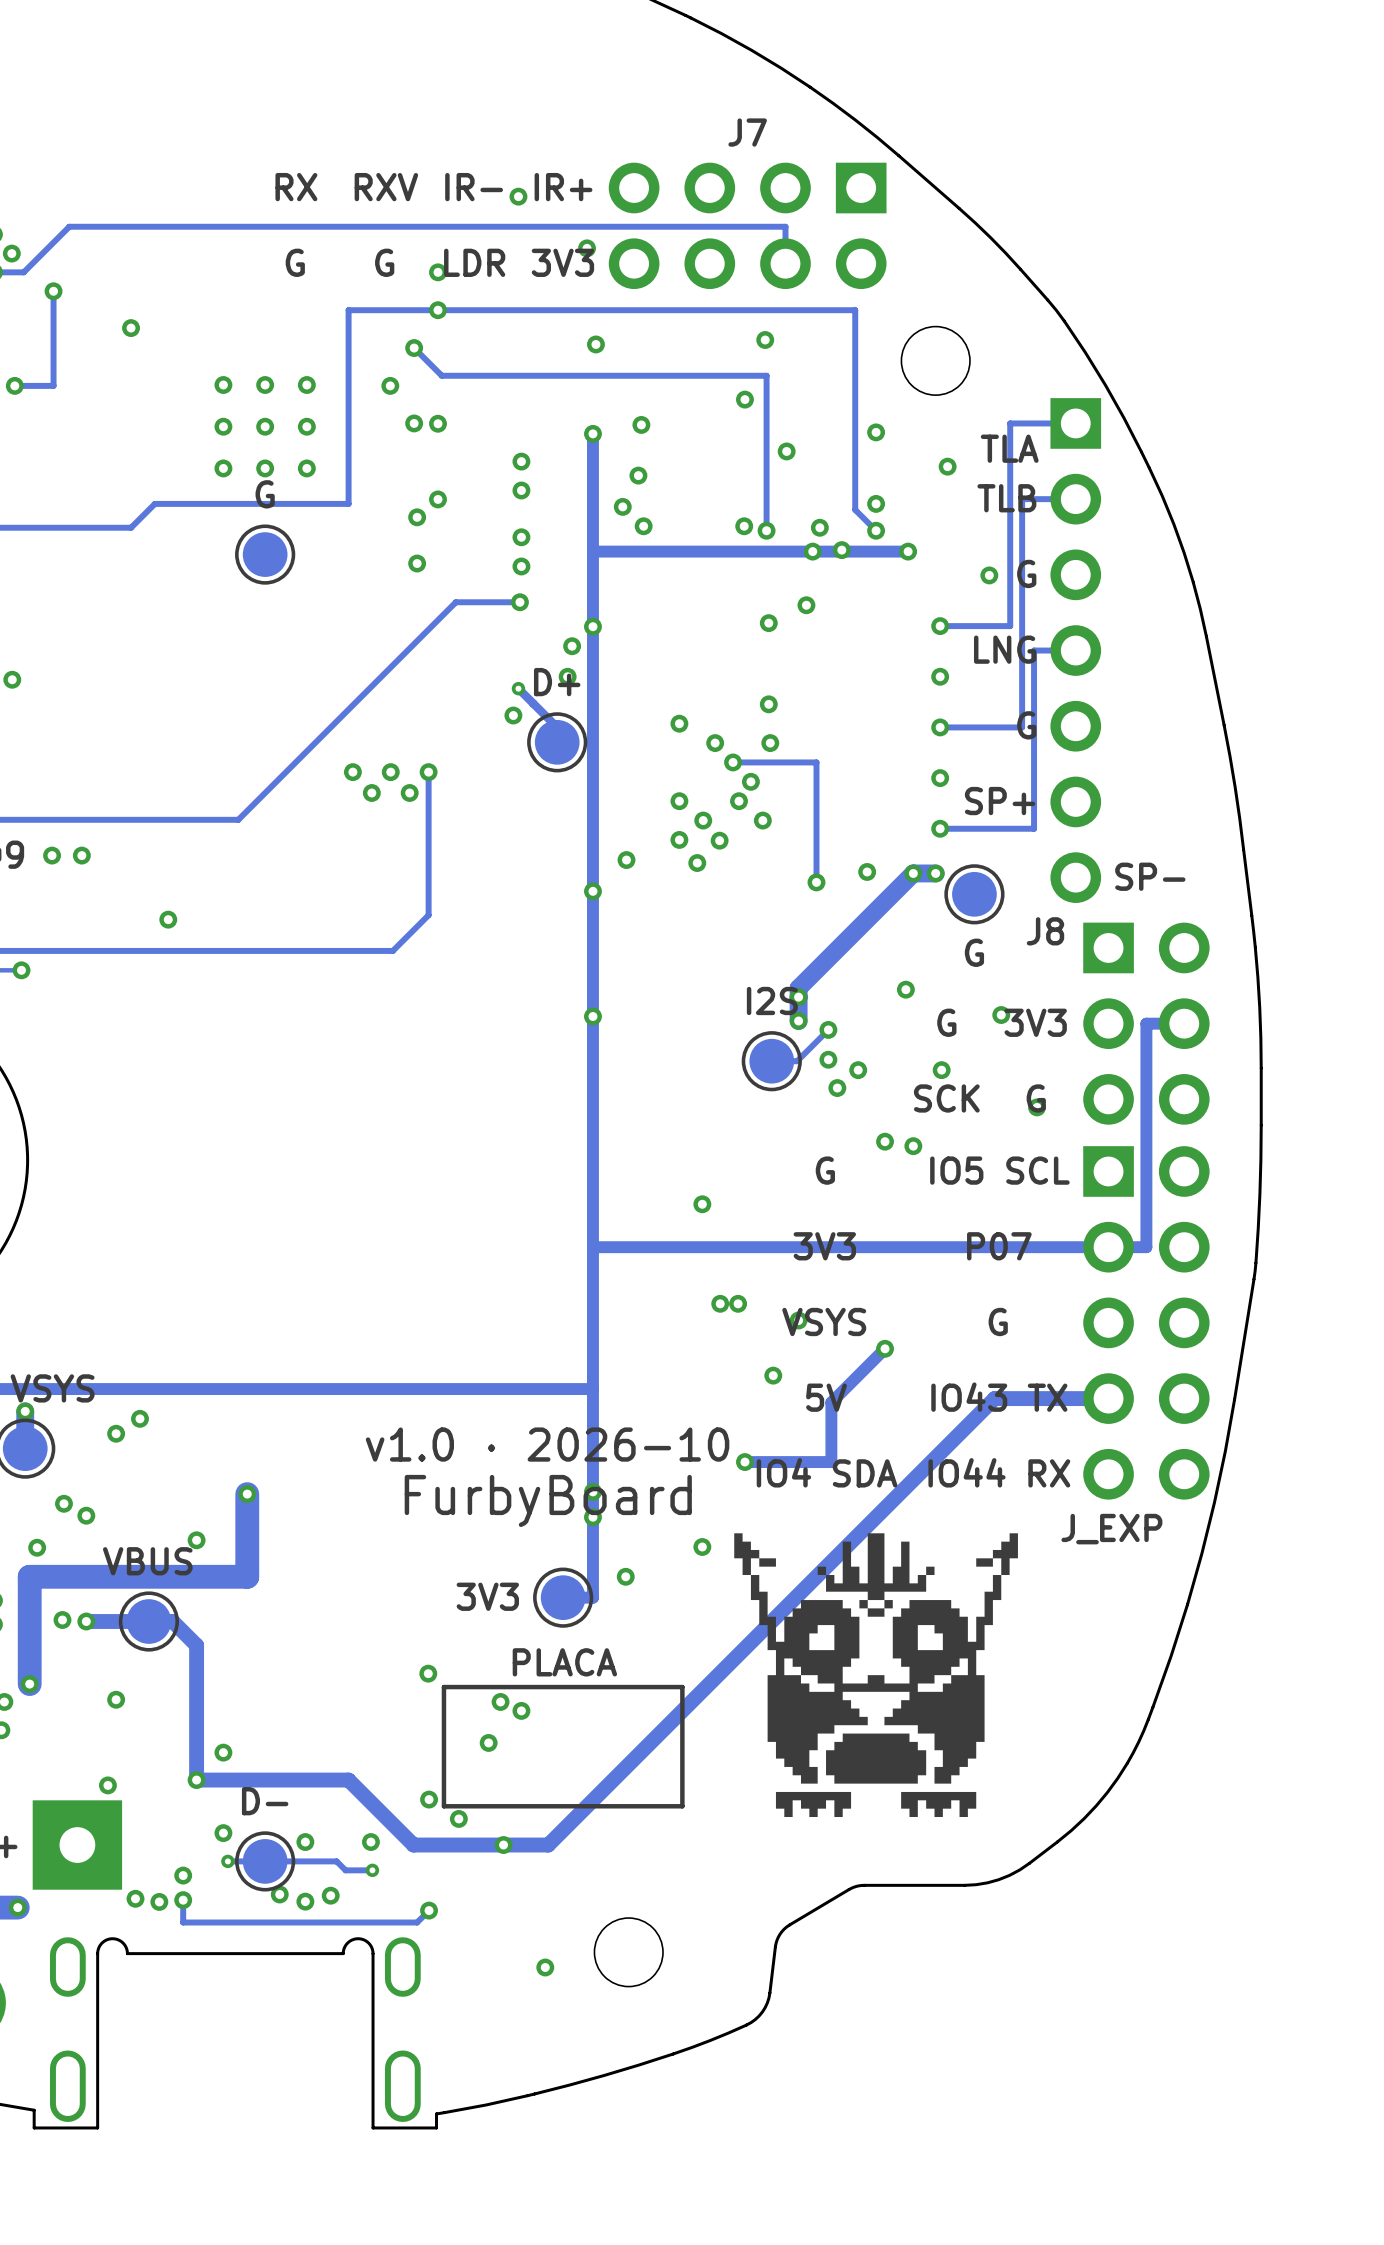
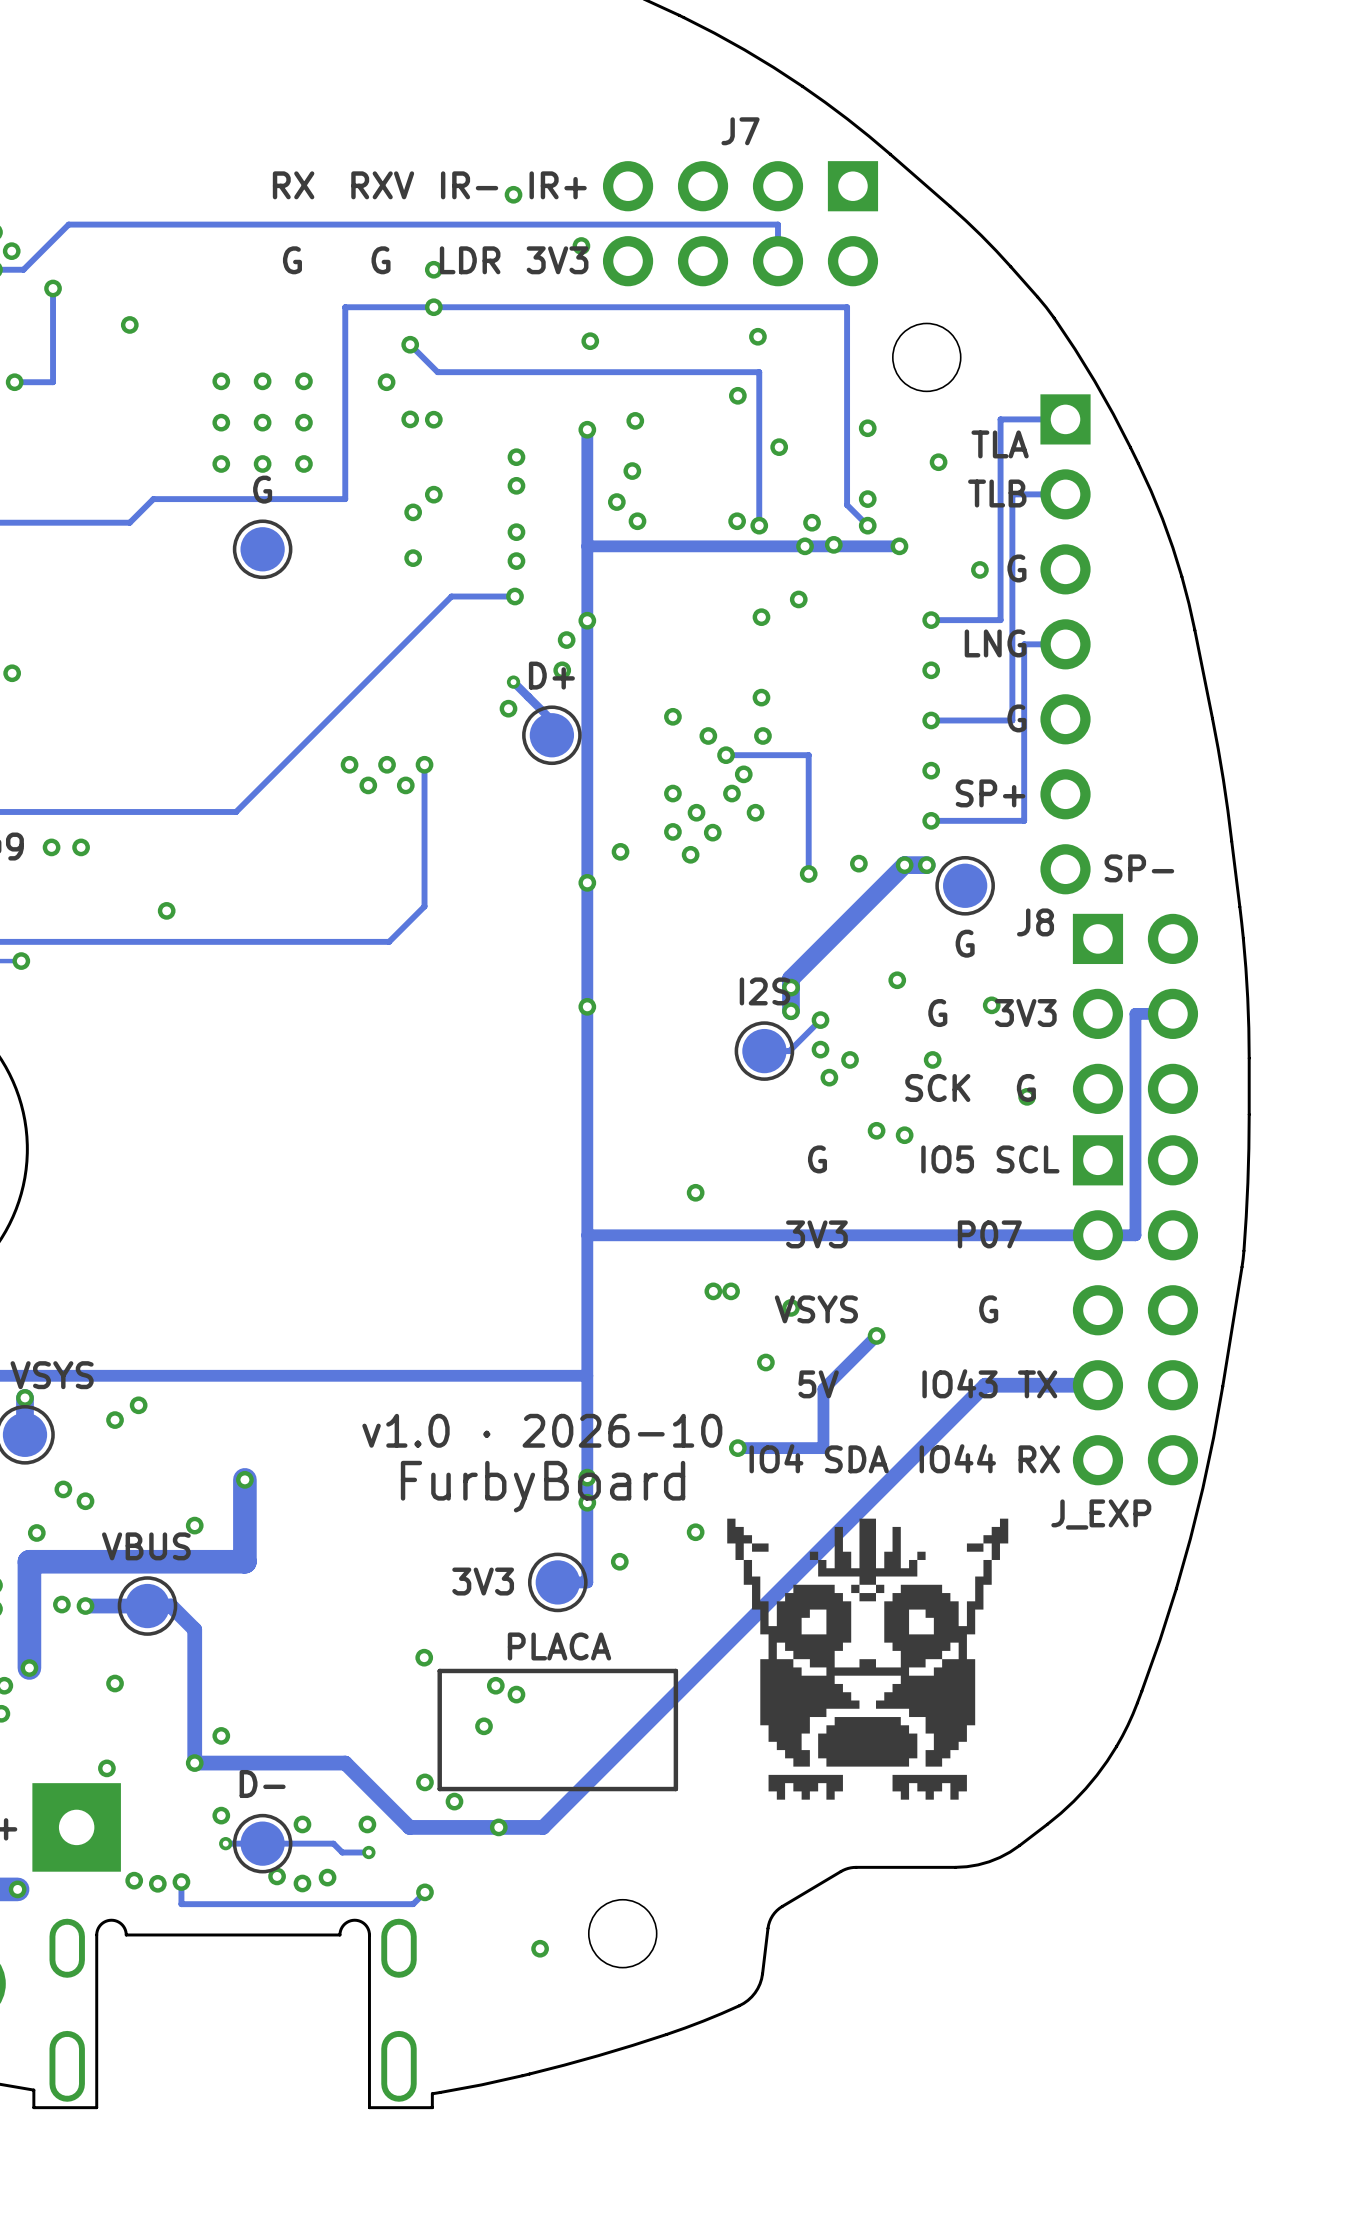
via: (183, 1875) -> none

